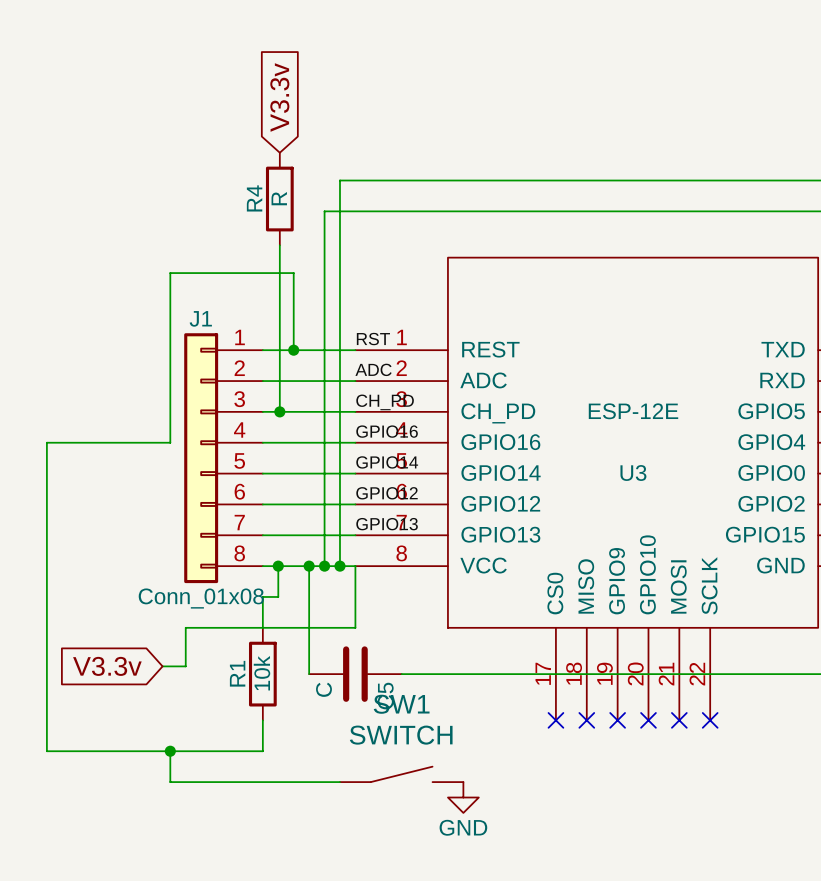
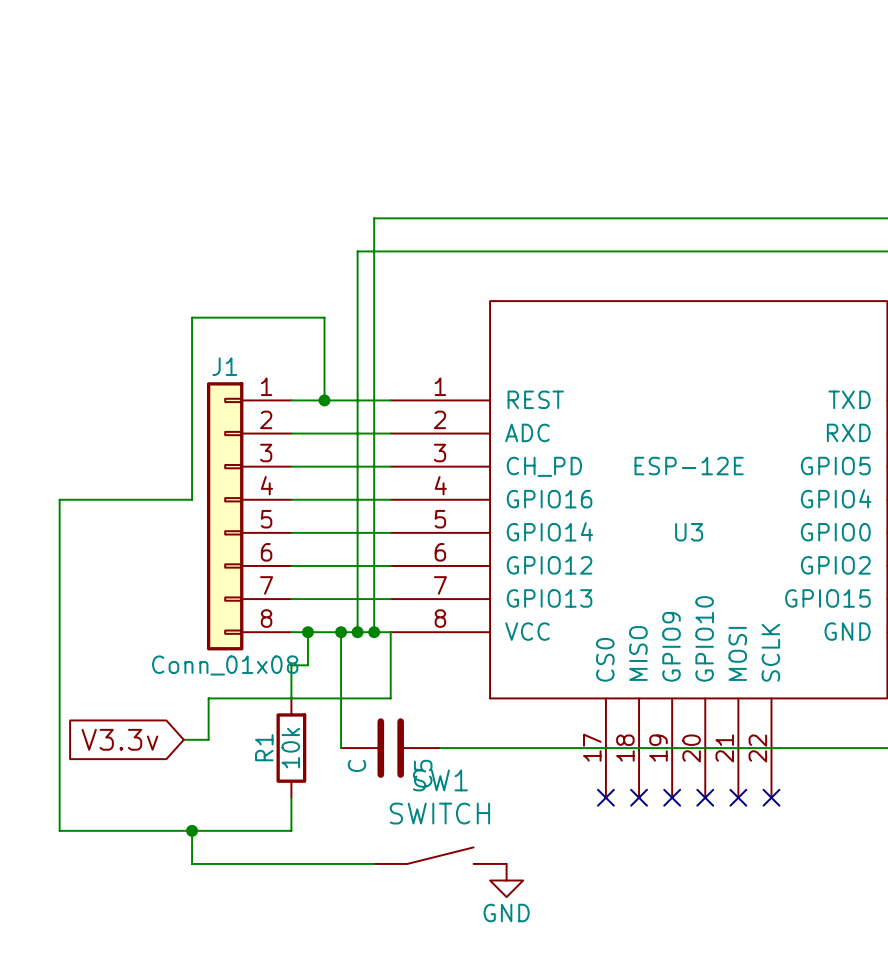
global label: V3.3v (279, 97) -> none
R4: R (279, 199) -> none
wire: (279, 245) (279, 411) -> none
label: RST (373, 339) -> none
label: ADC (373, 369) -> none
label: CH_PD (385, 402) -> none
junction: (279, 411) -> none
label: GPIO16 (387, 431) -> none
label: GPIO14 (387, 462) -> none
label: GPIO12 (387, 493) -> none
label: GPIO13 (387, 524) -> none

